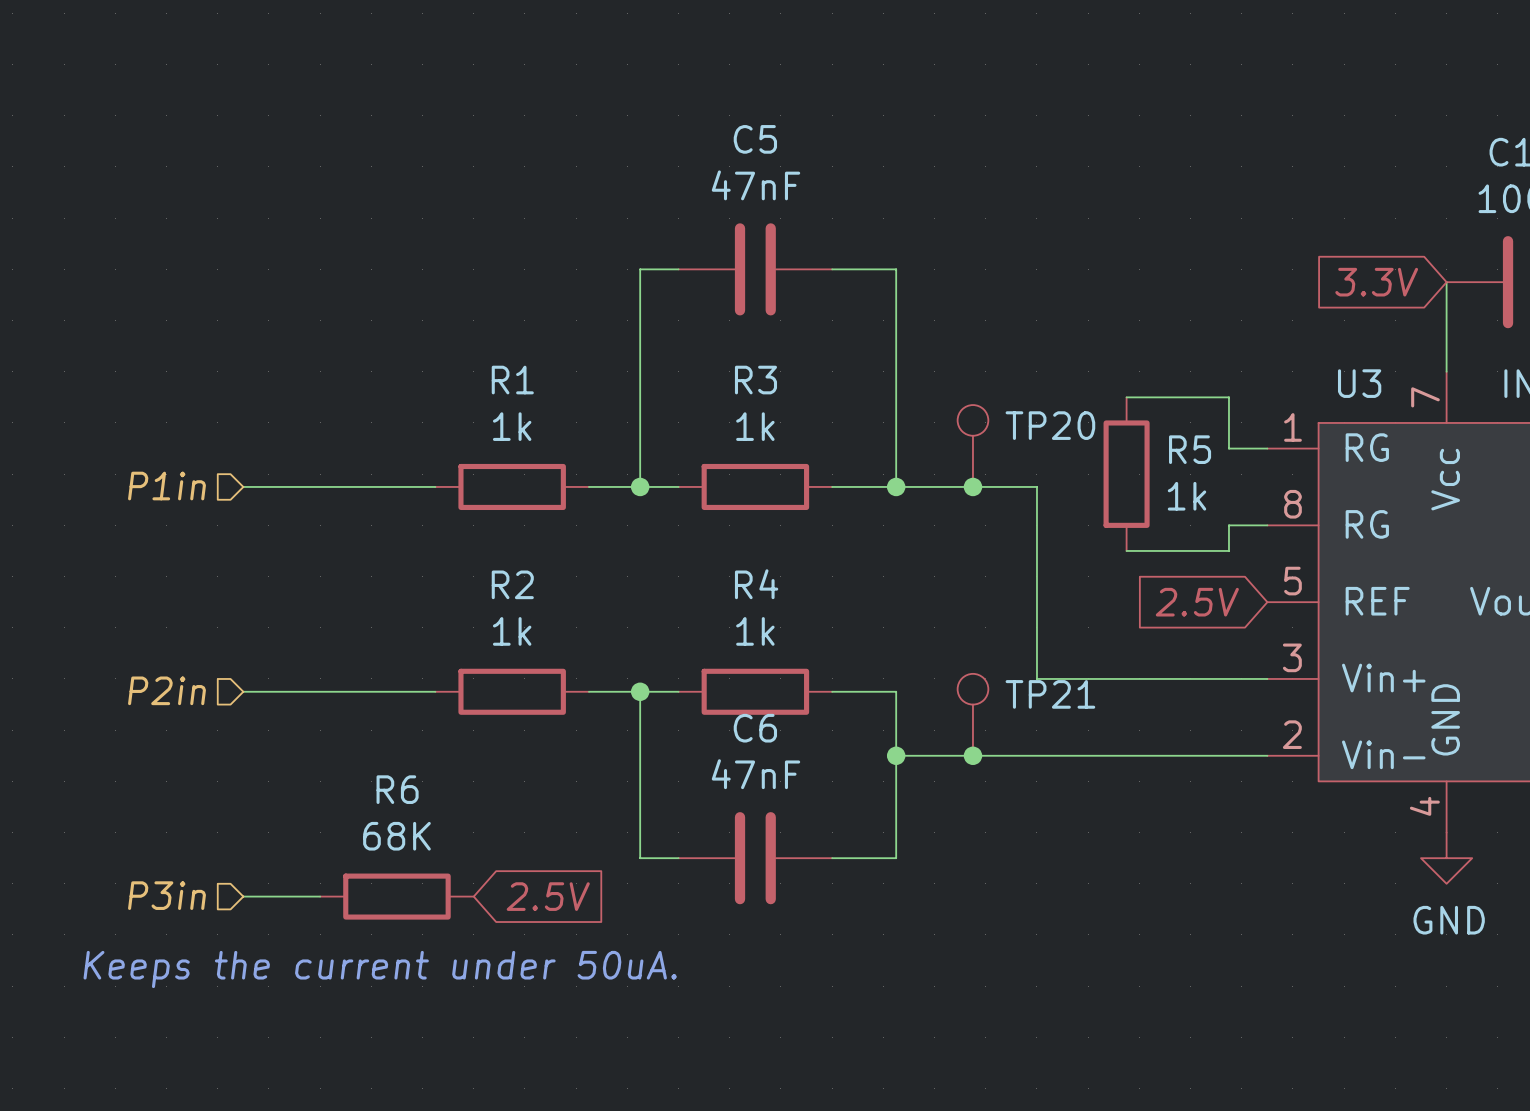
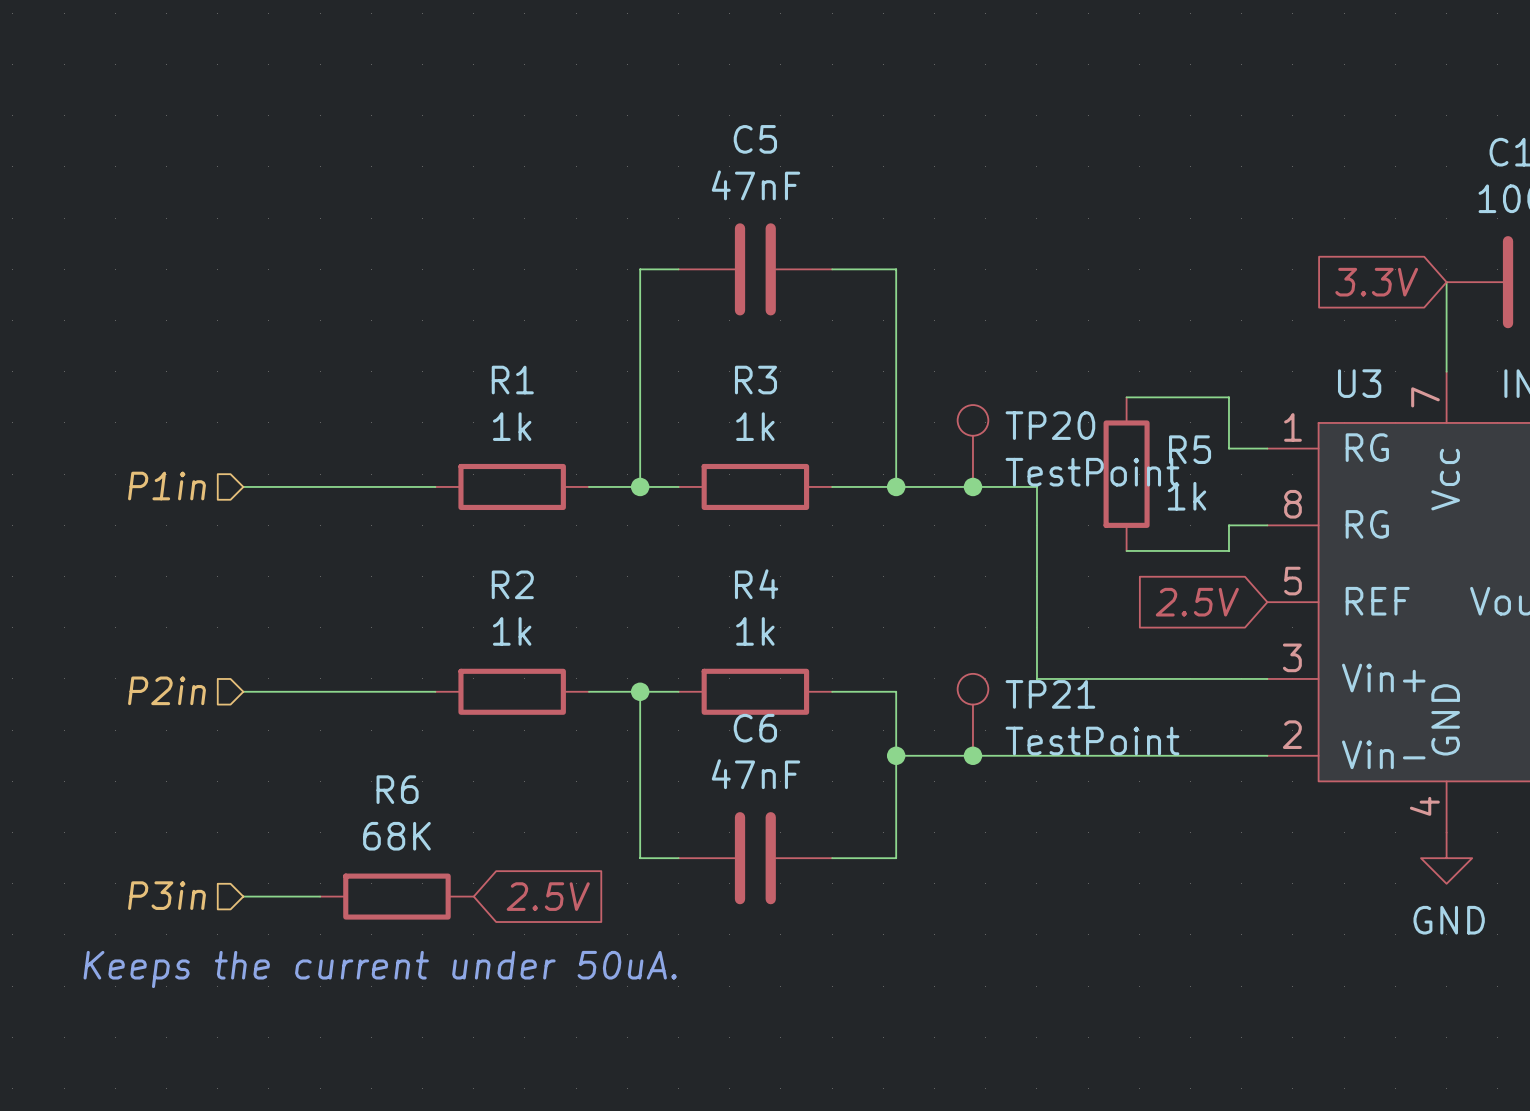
TP20 value: none -> TestPoint (1092, 472)
TP21 value: none -> TestPoint (1092, 741)

